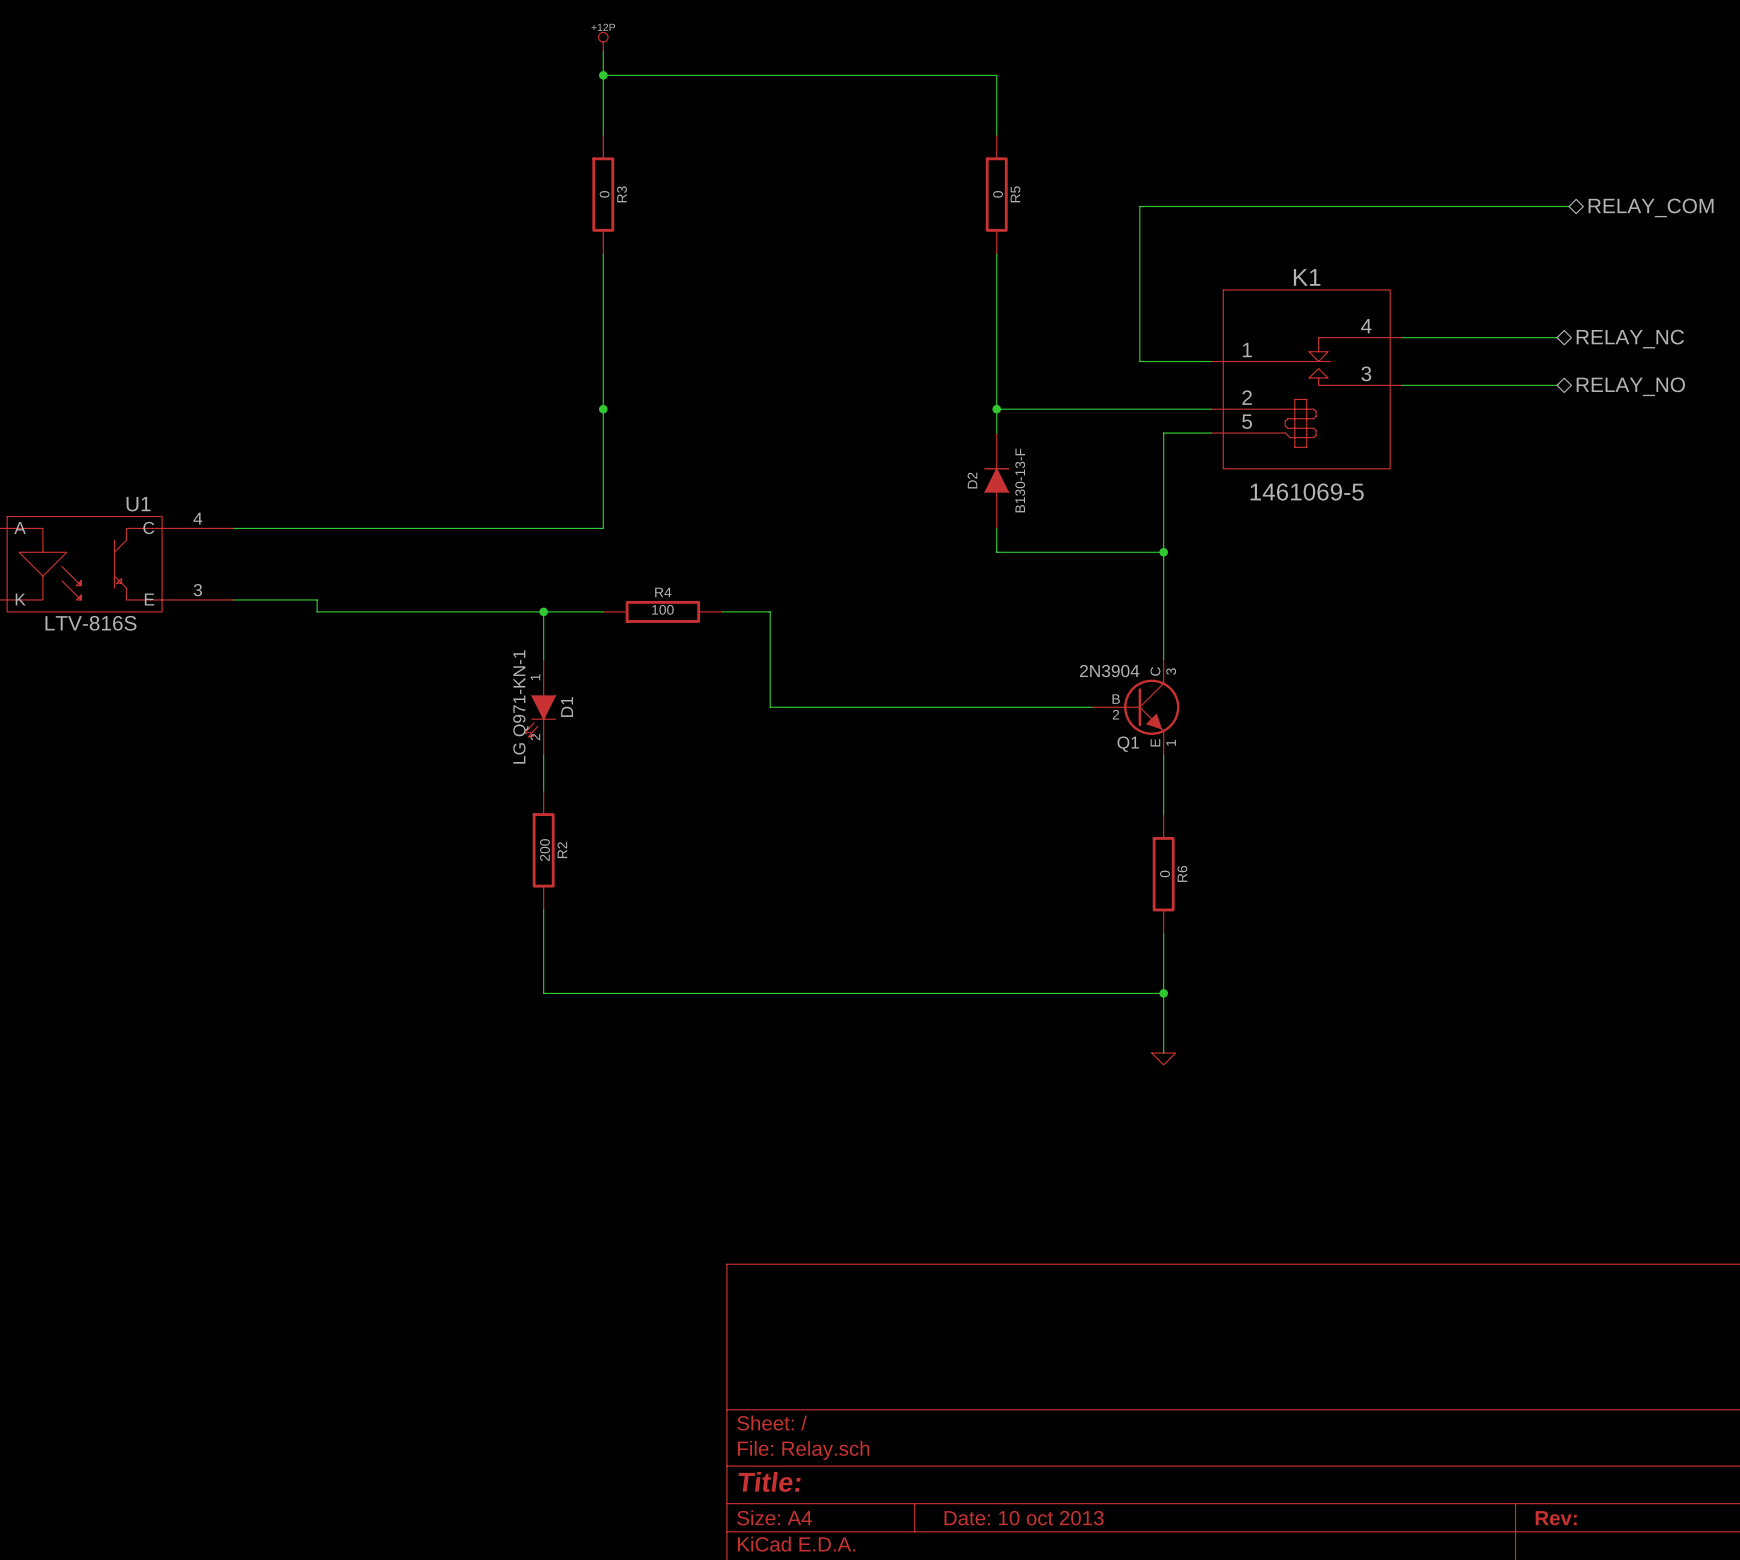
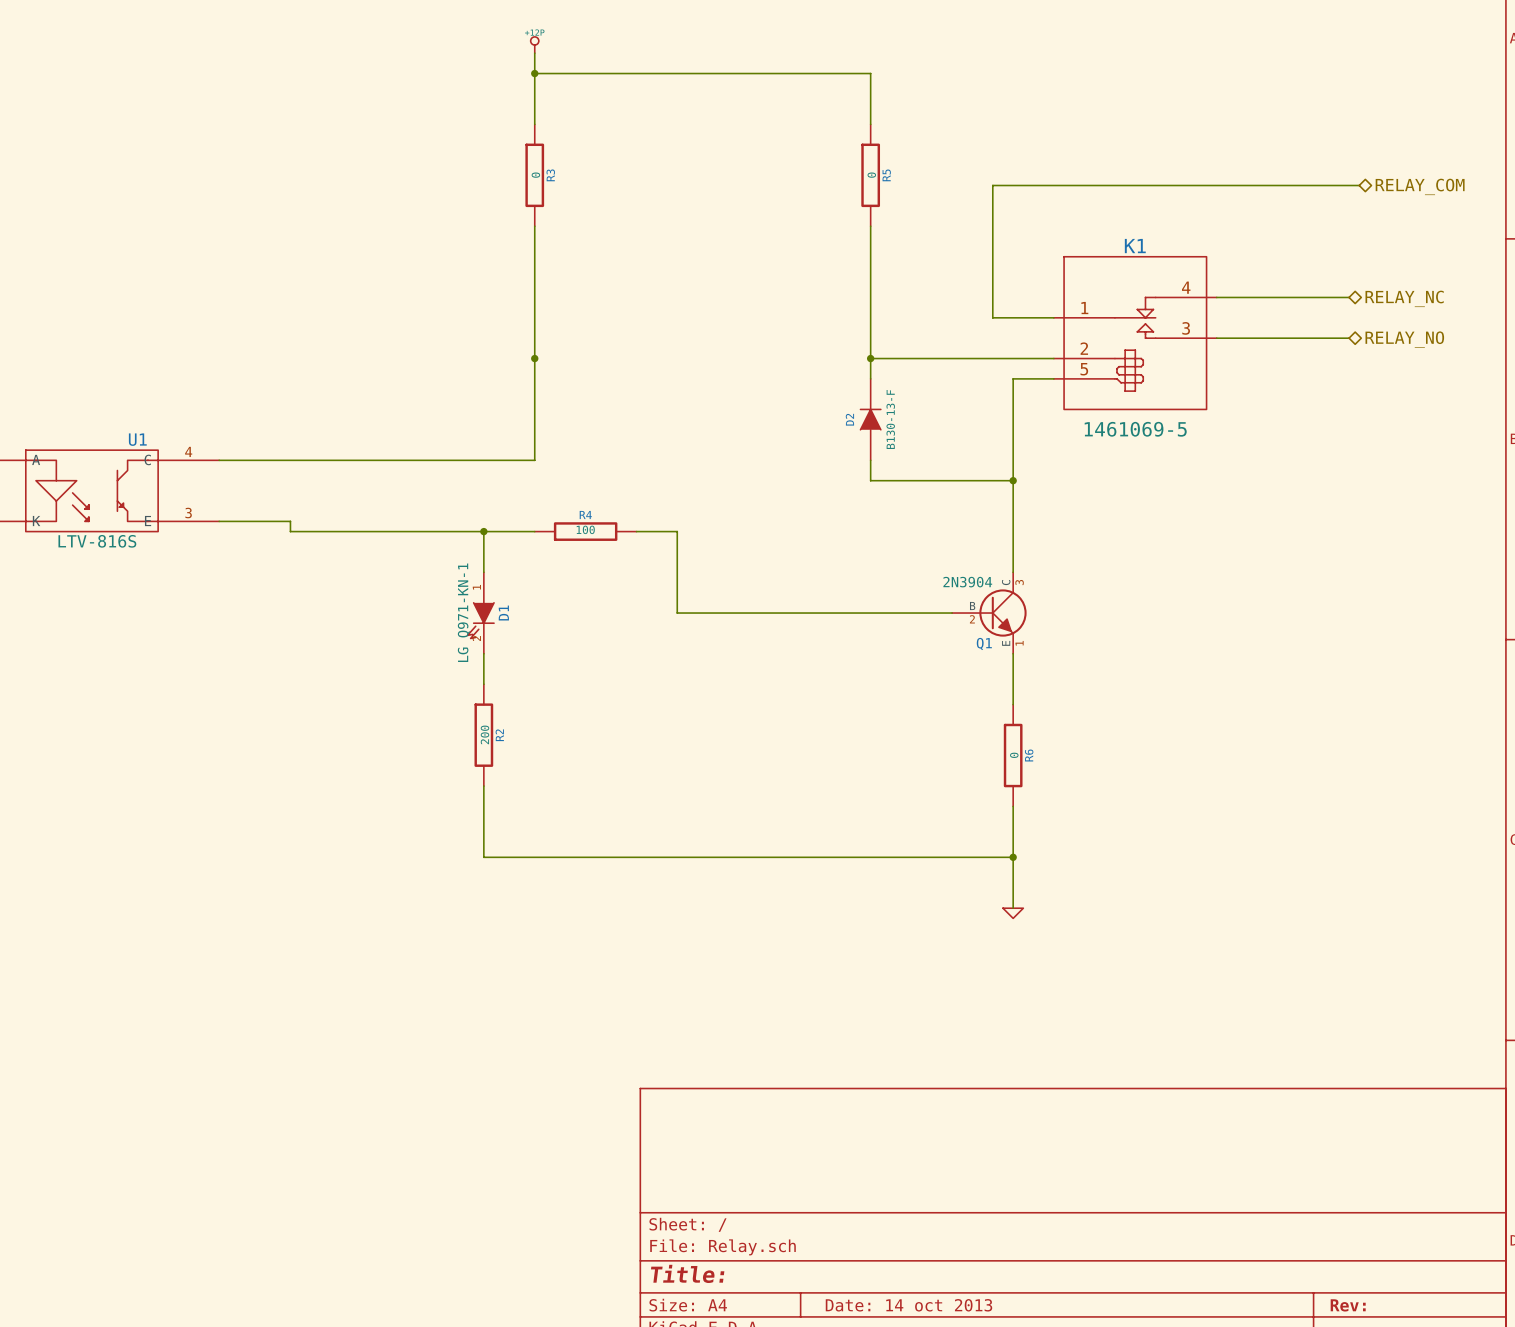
title block: Date: 10 oct 2013 (1024, 1518) -> Date: 14 oct 2013 (908, 1305)

